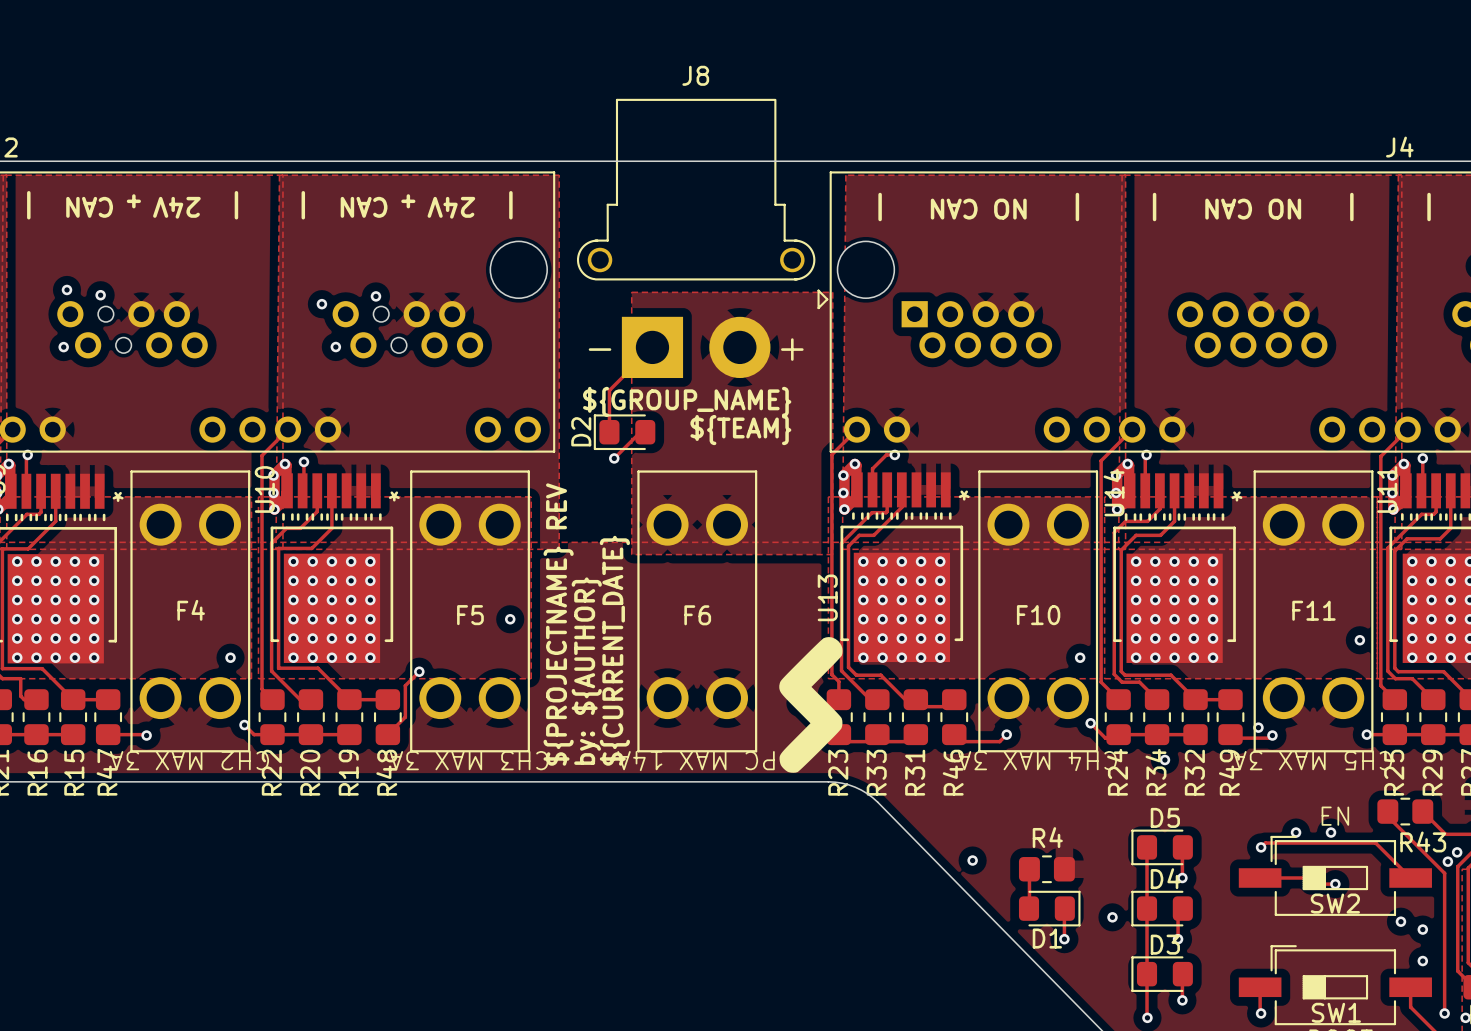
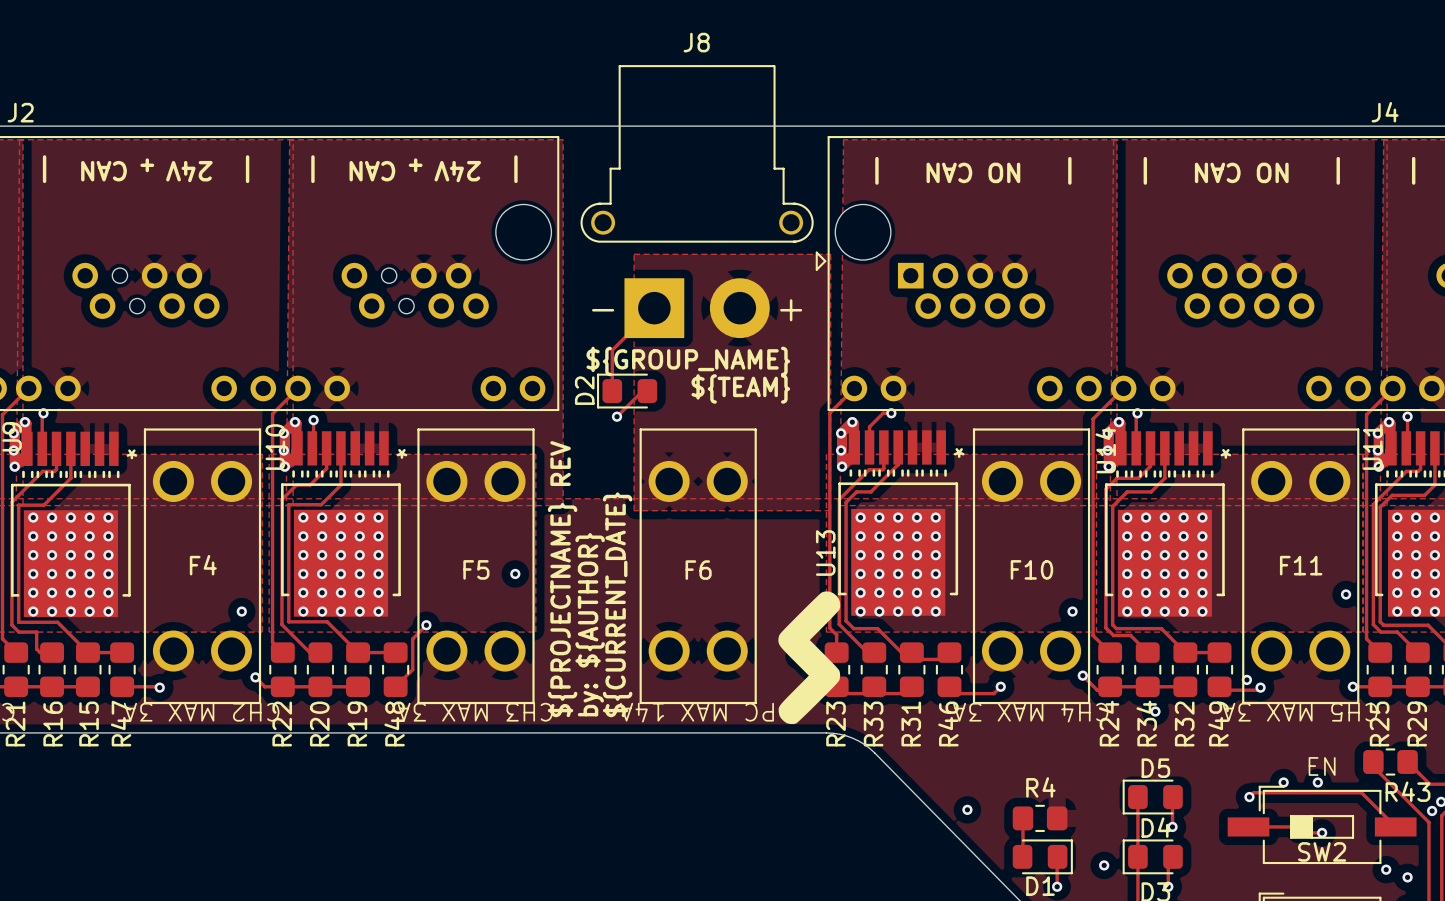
via: (66, 289) -> none
via: (100, 295) -> none
via: (375, 296) -> none
via: (321, 304) -> none
via: (63, 347) -> none
via: (335, 347) -> none

